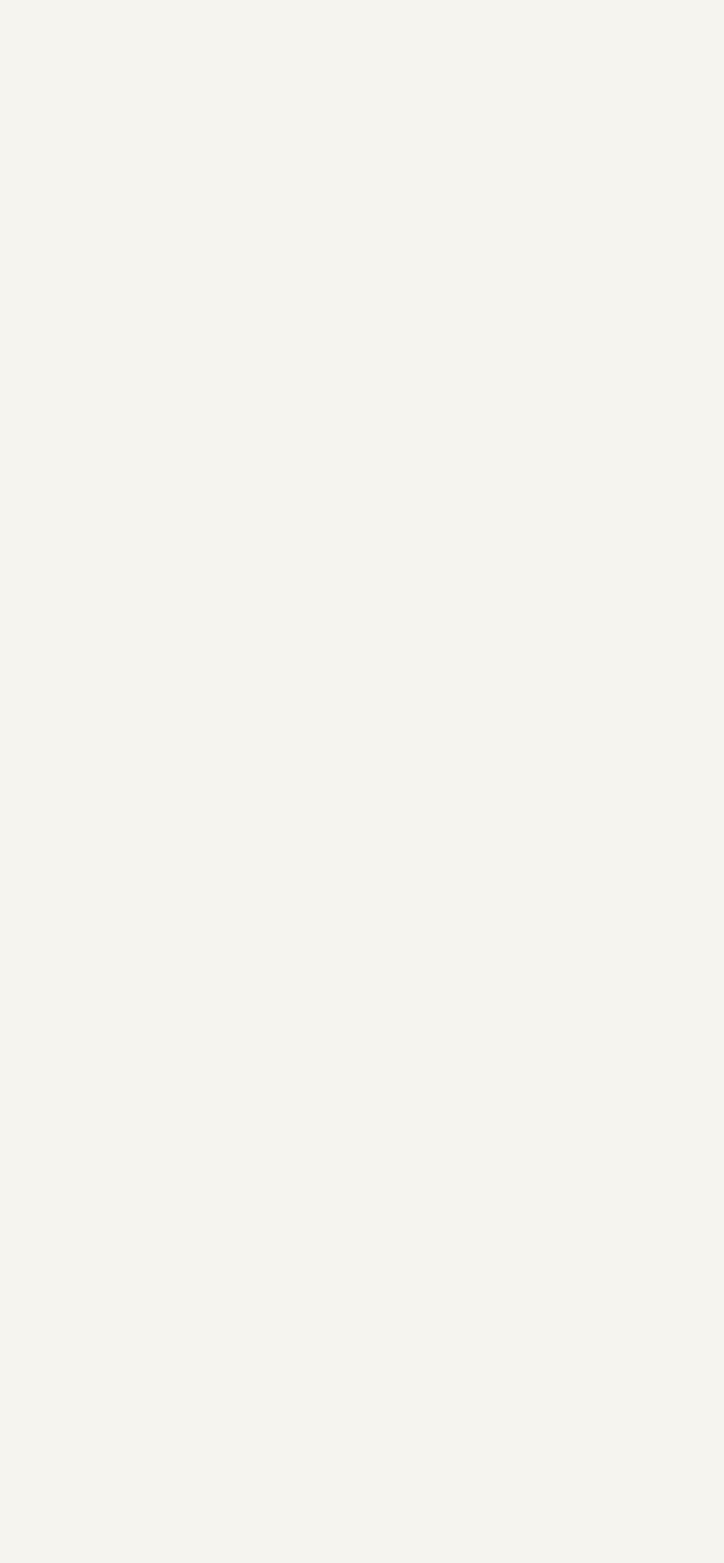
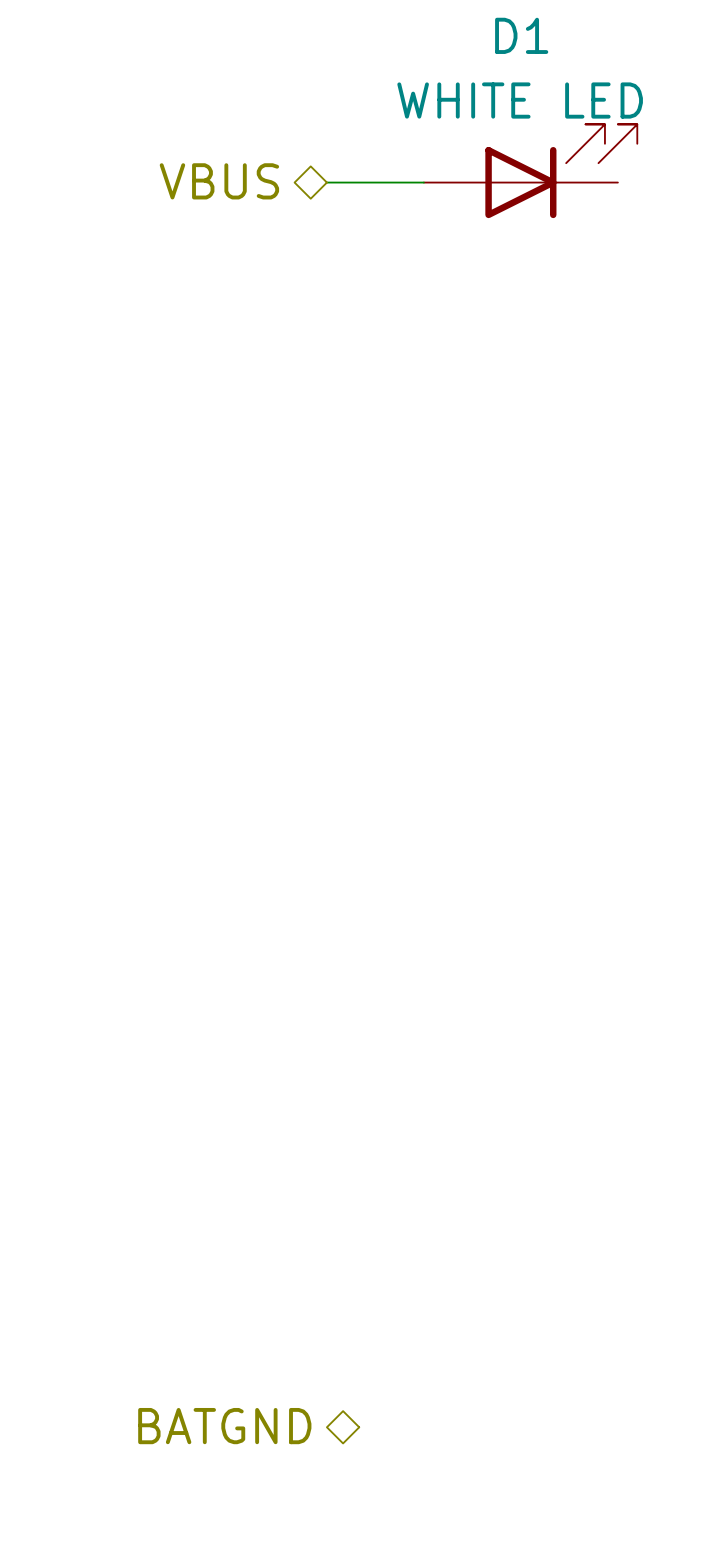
D1: none -> WHITE LED (530, 171)
hierarchical label: none -> VBUS (219, 181)
wire: none -> (326, 182) (423, 182)
hierarchical label: none -> BATGND (224, 1426)

